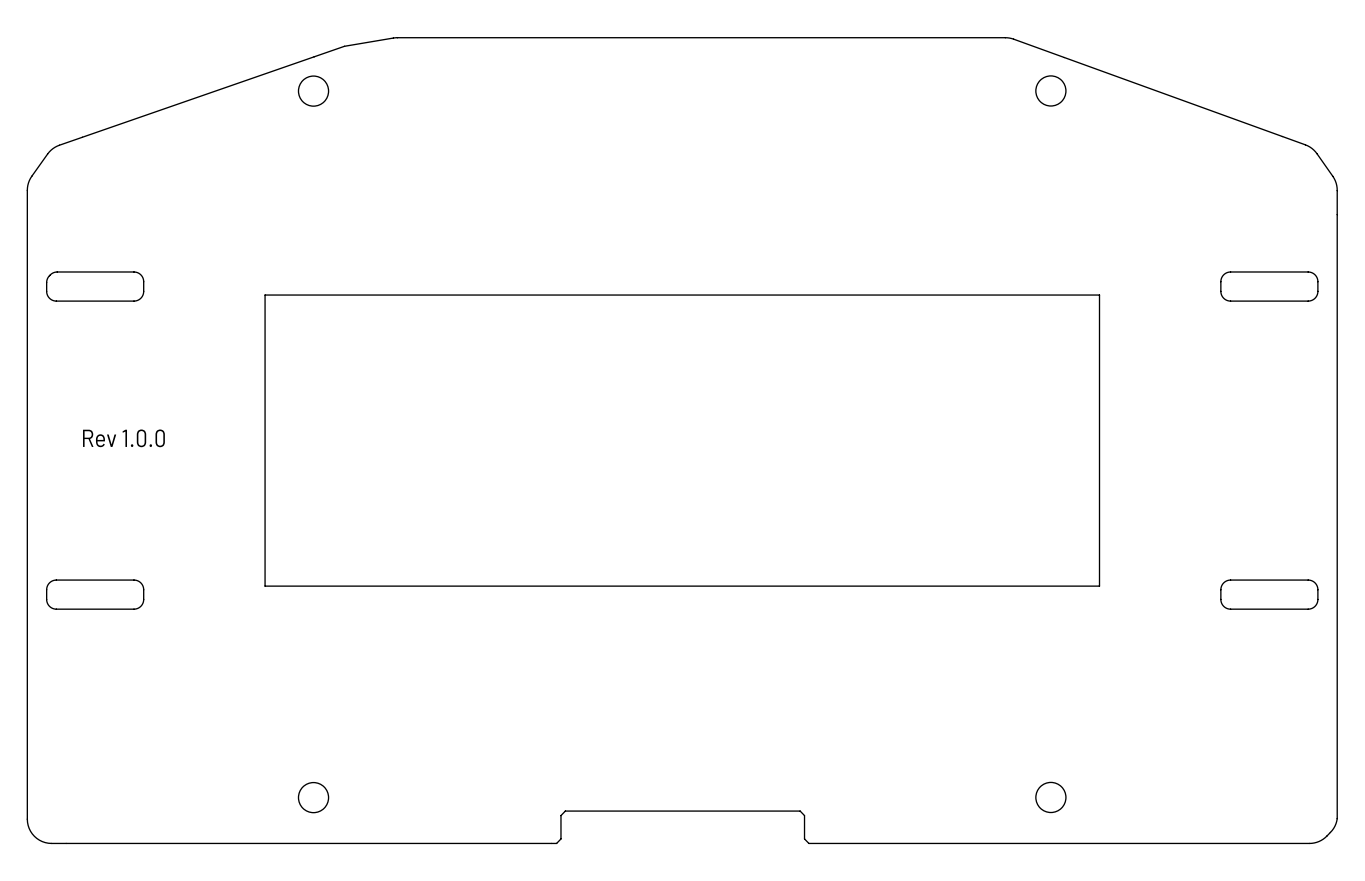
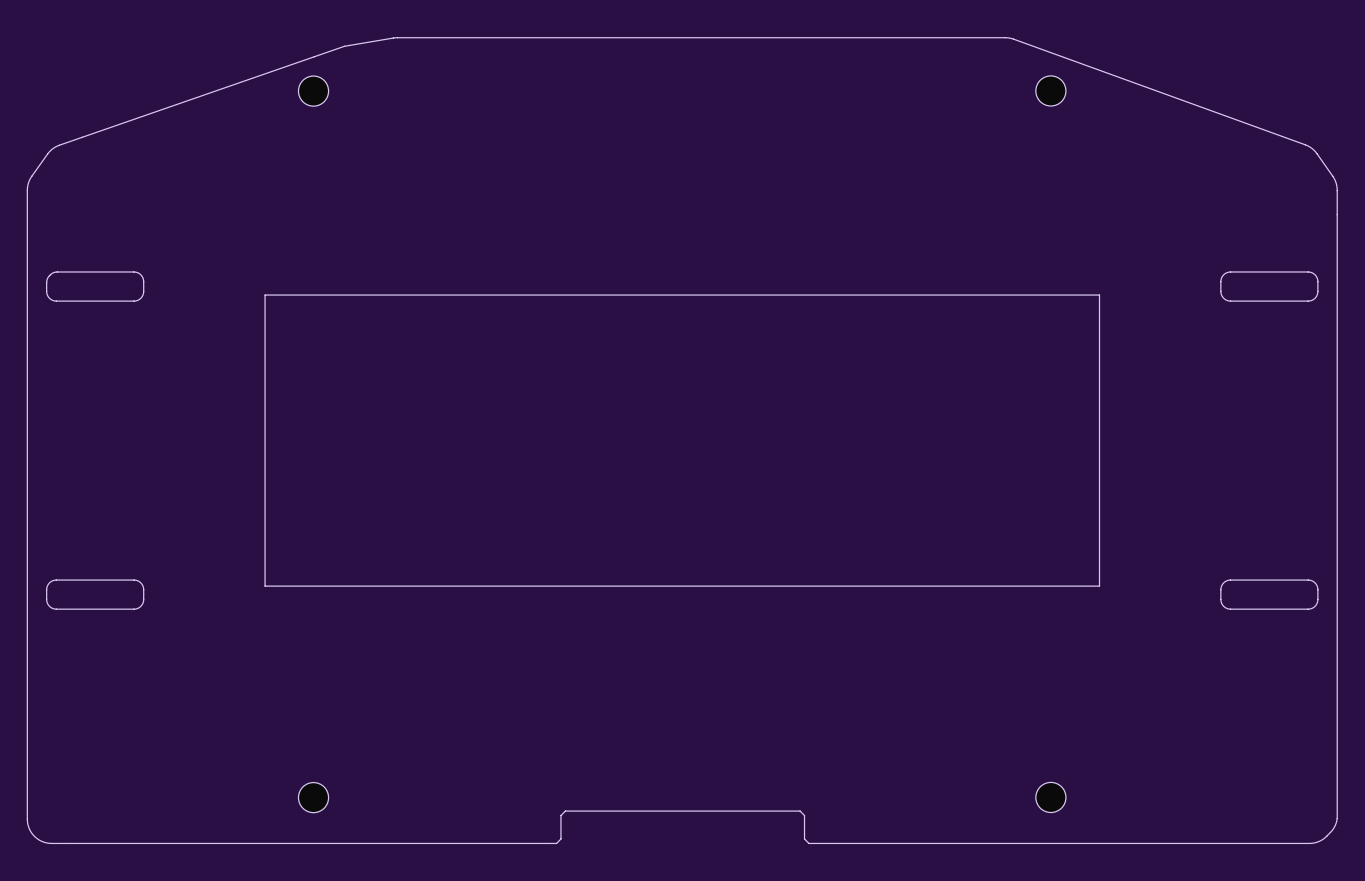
text: Rev 1.0.0 (123, 438) -> none

